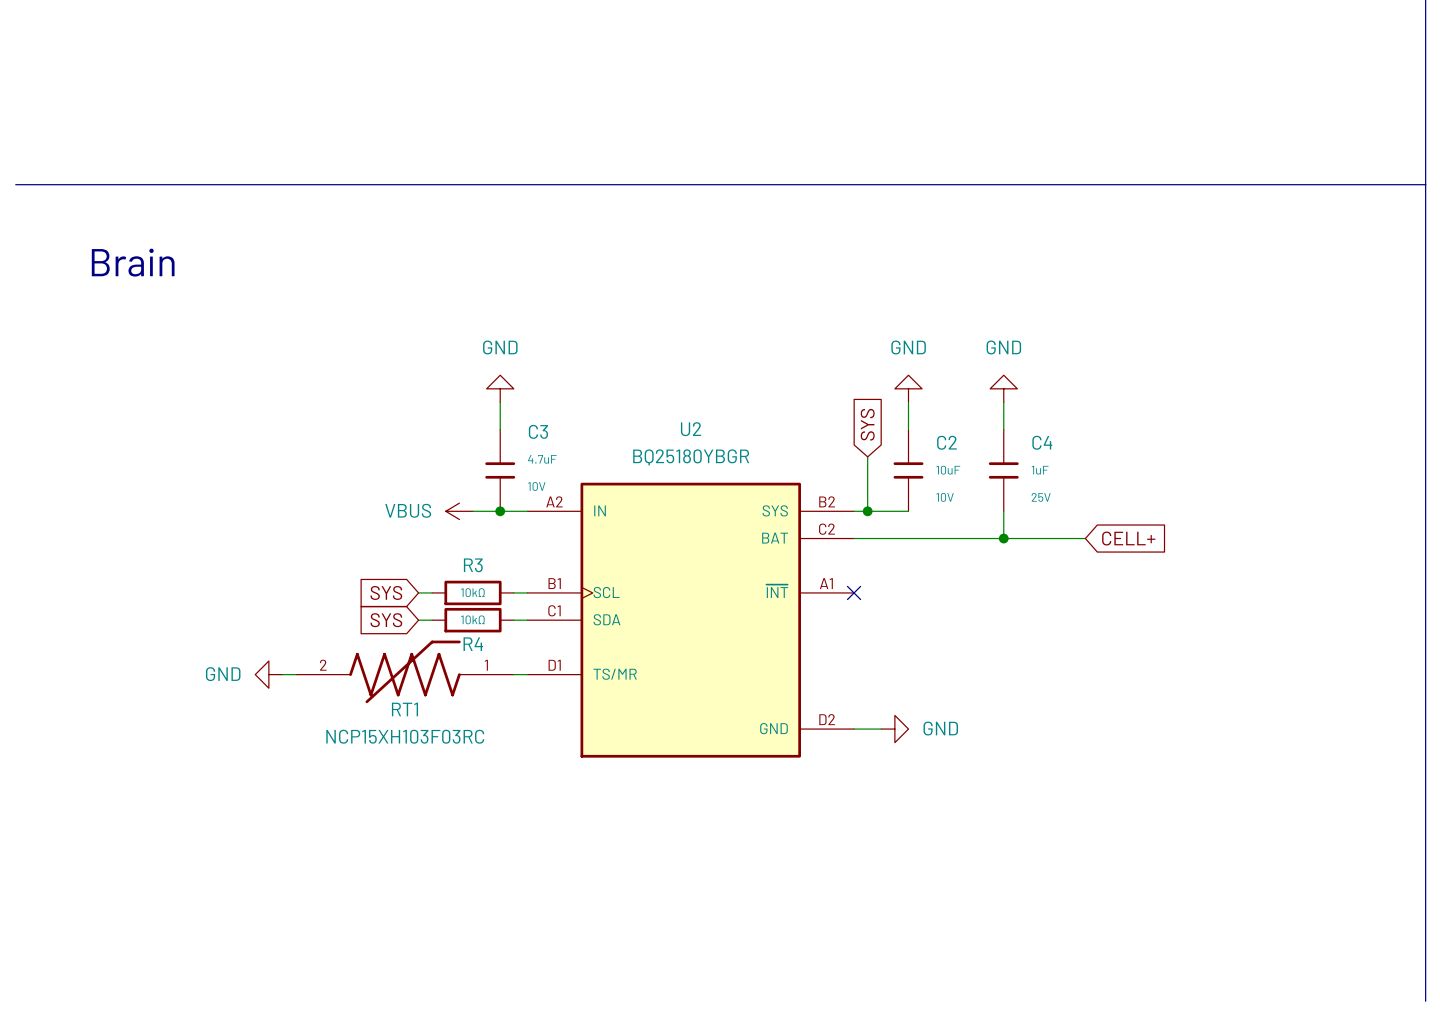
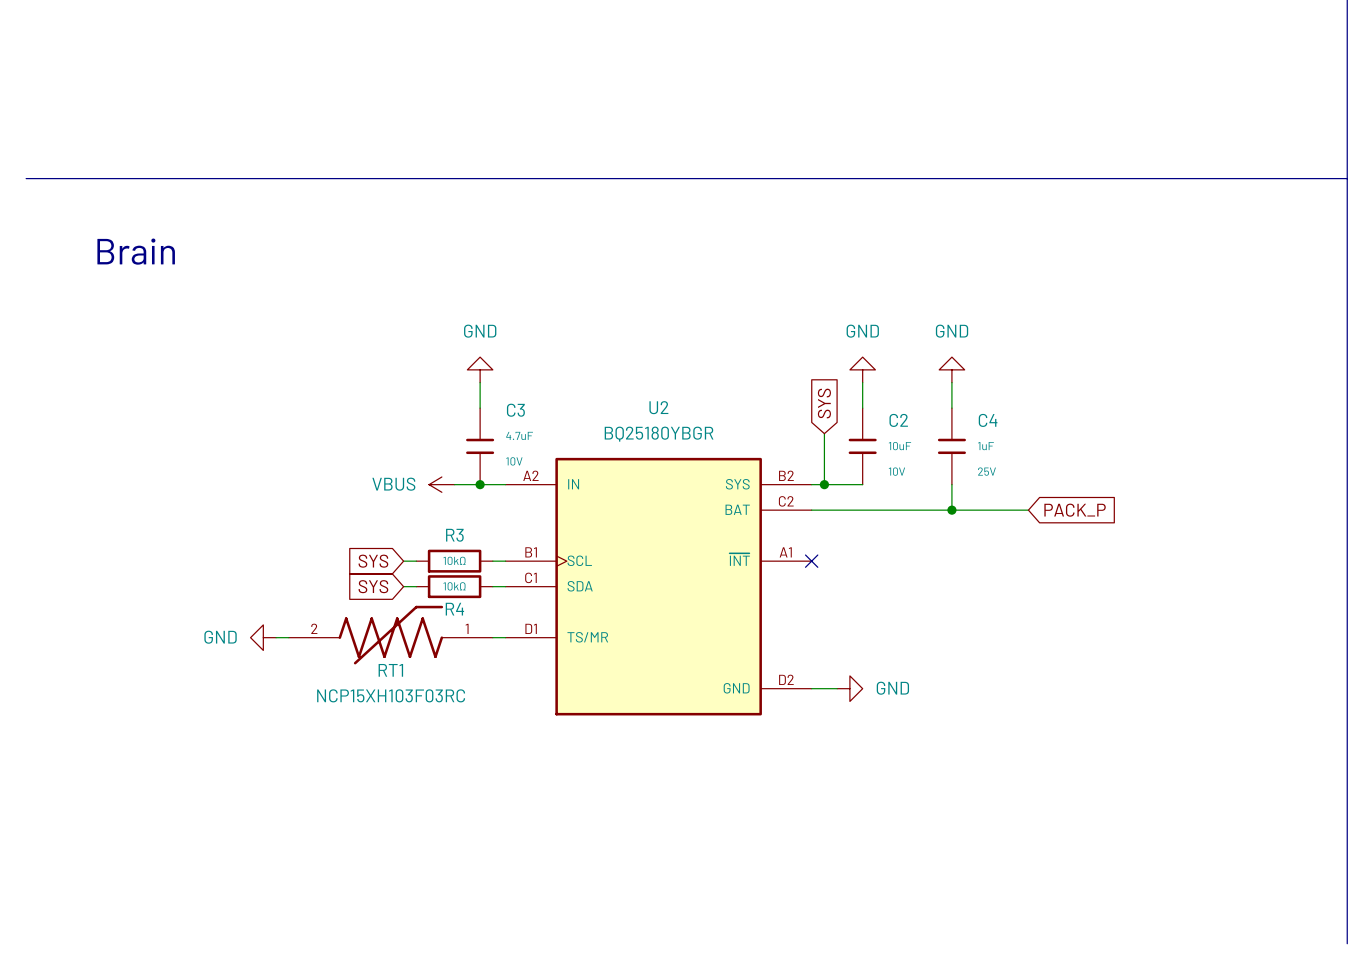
global label: CELL+ (1128, 538) -> PACK_P (1075, 510)

